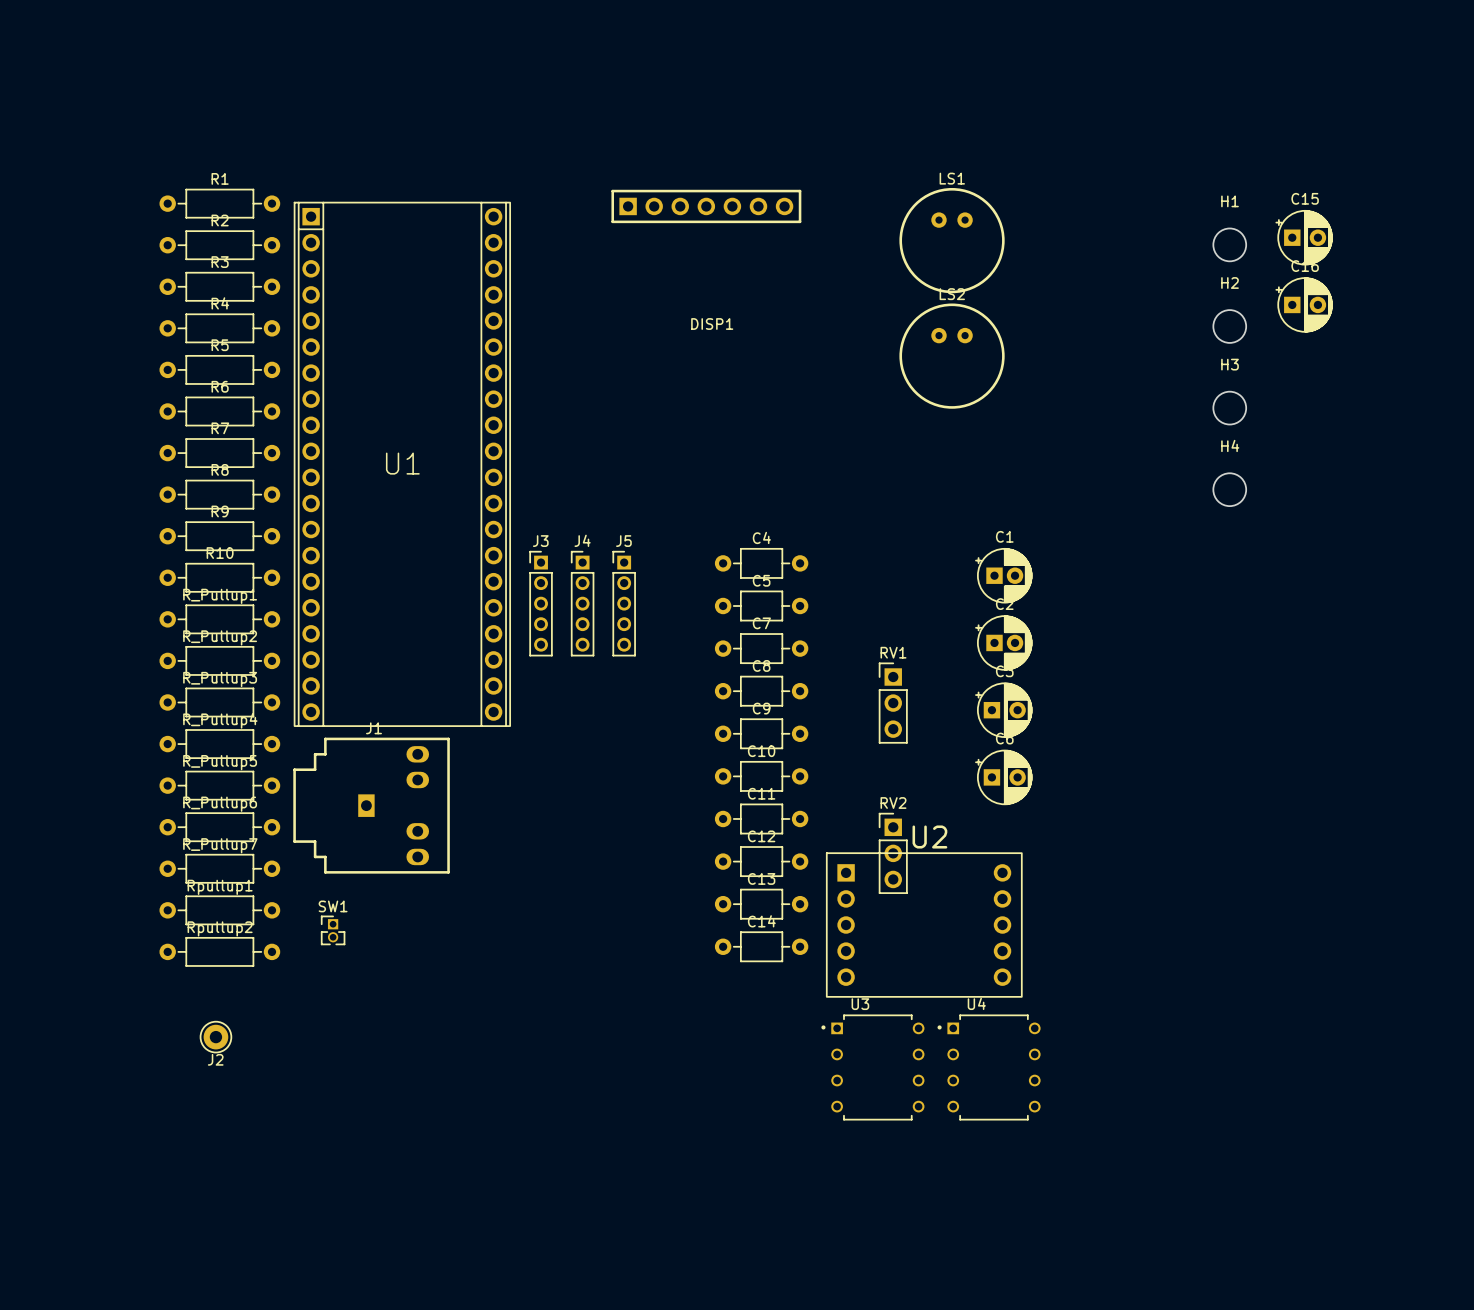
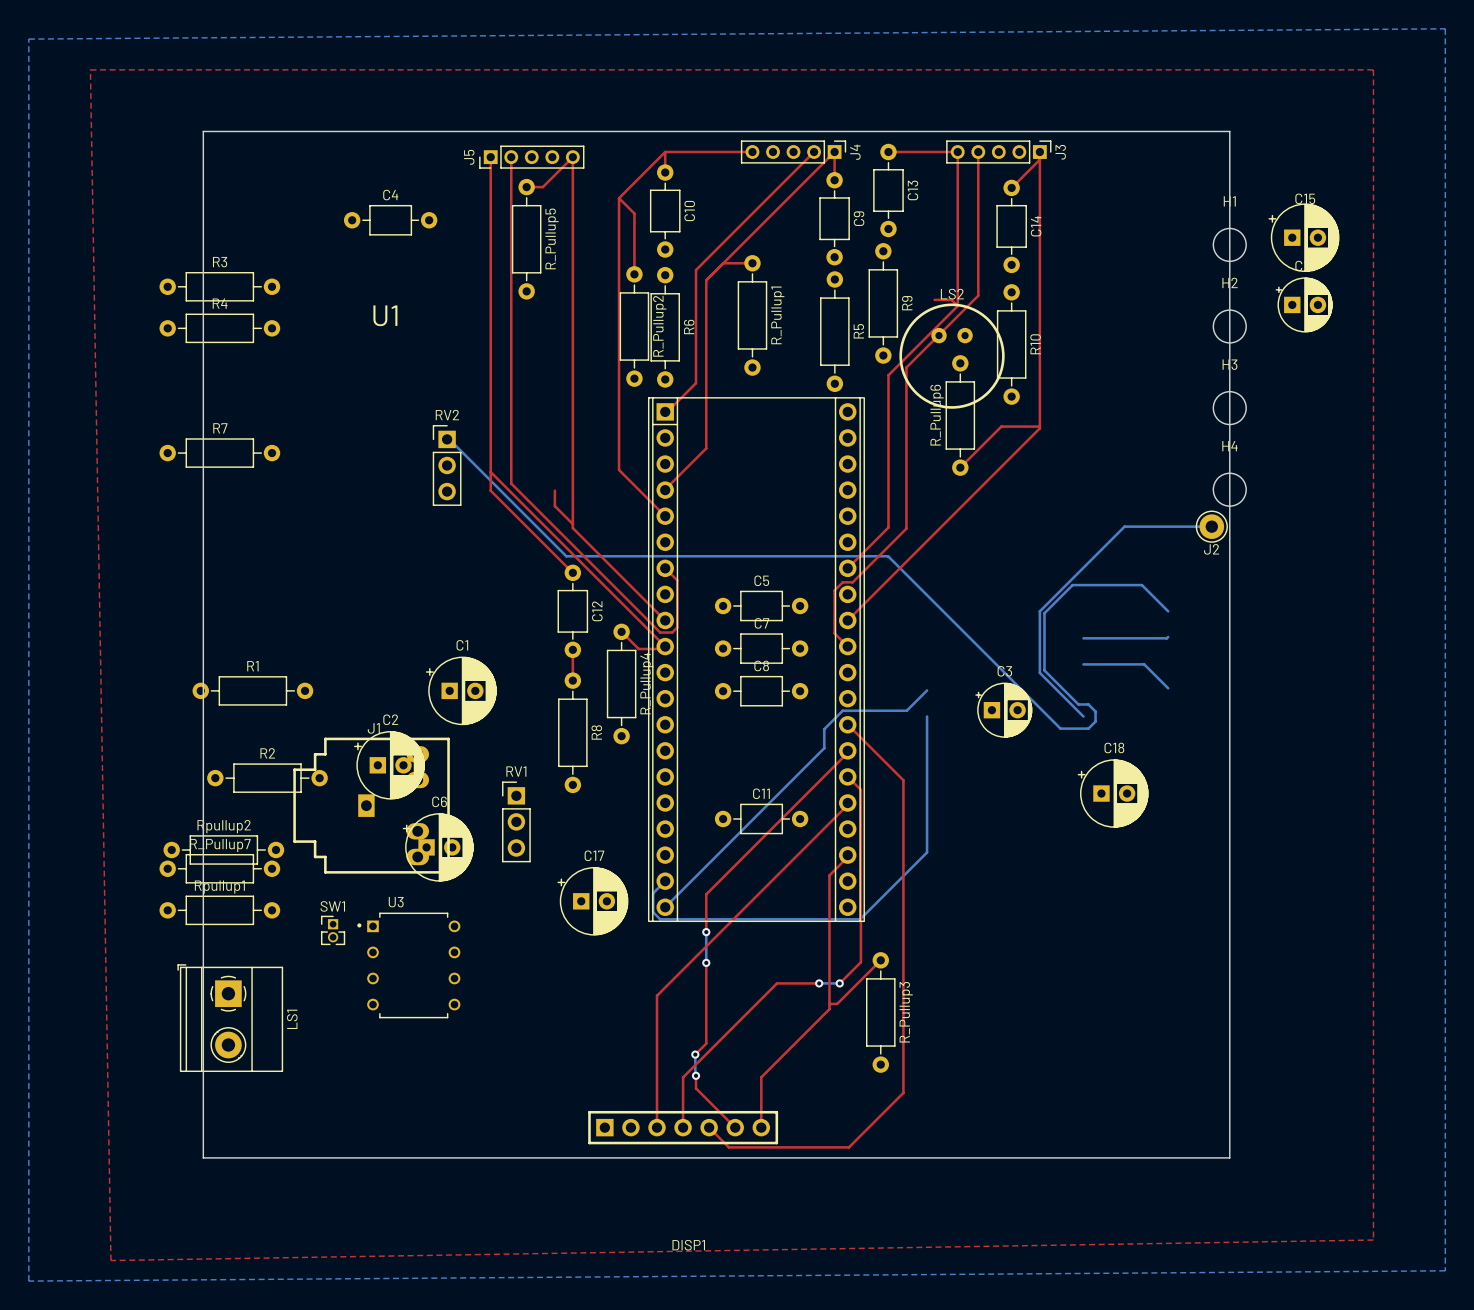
bottom zone outline: none -> (1445, 28) (28, 39) (28, 1281) (1445, 1270) (1445, 28)
top zone outline: none -> (90, 69) (1373, 69) (1373, 1240) (110, 1260) (90, 69)
board edge: none -> (203, 131) (1229, 131) (1229, 1157) (203, 1157) (203, 131)
top track: none -> (665, 152) (752, 152)
top track: none -> (665, 152) (665, 172)
top track: none -> (665, 152) (619, 198)
top track: none -> (814, 152) (696, 270) (696, 383) (666, 412)
top track: none -> (888, 152) (957, 152) (957, 305)
top track: none -> (978, 152) (978, 295) (906, 367) (906, 528) (852, 582) (842, 582) (834, 590) (834, 633) (847, 646)
top track: none -> (1039, 152) (1039, 428) (847, 620)
top track: none -> (490, 157) (490, 490) (572, 572)
top track: none -> (511, 157) (511, 483) (660, 632) (672, 632) (677, 627) (677, 580) (665, 568)
top track: none -> (1039, 159) (1011, 187)
LS1 name position: LS1 (952, 178) -> LS1 (292, 1019)
top track: none -> (834, 180) (834, 152) (706, 280) (706, 448) (668, 486) (665, 486)
top track: none -> (526, 187) (542, 187) (572, 157) (572, 528) (665, 620)
LS1 footprint: [899, 187, 1005, 294] -> [177, 964, 284, 1072]
top track: none -> (619, 198) (634, 213) (634, 274)
top track: none -> (619, 198) (619, 469) (665, 516)
R1 position: (219, 203) -> (252, 690)
DISP1 position: (706, 206) -> (683, 1127)
C15 footprint: [1275, 210, 1333, 266] -> [1268, 203, 1340, 272]
R2 position: (219, 245) -> (267, 778)
top track: none -> (723, 263) (752, 263)
top track: none -> (934, 299) (951, 299) (957, 305)
top track: none -> (957, 305) (888, 375) (888, 527) (847, 568)
R5 rotation: 0° (219, 369) -> 90° clockwise (834, 331)
R5 position: (219, 369) -> (834, 331)
R6 rotation: 0° (219, 411) -> 90° clockwise (665, 327)
R6 position: (219, 411) -> (665, 327)
top track: none -> (1039, 426) (1001, 426) (960, 467)
bottom track: none -> (447, 439) (449, 439) (566, 556) (888, 556) (1060, 728) (1088, 728) (1095, 721) (1095, 711) (1088, 704) (1078, 704) (1044, 670) (1044, 613) (1072, 585) (1141, 585) (1168, 611)
U1 name position: U1 (402, 463) -> U1 (385, 315)
U1 position: (402, 464) -> (756, 659)
top track: none -> (490, 472) (665, 646) (662, 649) (638, 649) (621, 631)
top track: none -> (554, 490) (554, 506) (572, 524)
R8 rotation: 0° (219, 494) -> 90° clockwise (572, 732)
R8 position: (219, 494) -> (572, 732)
bottom track: none -> (1211, 526) (1124, 526) (1039, 611) (1039, 672) (1083, 716)
R9 rotation: 0° (219, 536) -> 90° clockwise (883, 303)
R9 position: (219, 536) -> (883, 303)
C1 footprint: [975, 548, 1033, 604] -> [425, 656, 497, 726]
C4 position: (761, 563) -> (390, 220)
R10 rotation: 0° (219, 577) -> 90° clockwise (1011, 344)
R10 position: (219, 577) -> (1011, 344)
J3 rotation: 0° (541, 603) -> 90° clockwise (998, 152)
J3 position: (541, 603) -> (998, 152)
J4 rotation: 0° (582, 603) -> 90° clockwise (793, 152)
J4 position: (582, 603) -> (793, 152)
J5 rotation: 0° (624, 603) -> 90° counterclockwise (531, 157)
J5 position: (624, 603) -> (531, 157)
C2 footprint: [975, 615, 1033, 671] -> [354, 731, 425, 800]
R_Pullup1 rotation: 0° (219, 619) -> 90° clockwise (752, 315)
R_Pullup1 position: (219, 619) -> (752, 315)
bottom track: none -> (1168, 637) (1083, 638)
top track: none -> (572, 649) (572, 680)
R_Pullup2 rotation: 0° (219, 660) -> 90° clockwise (634, 326)
R_Pullup2 position: (219, 660) -> (634, 326)
bottom track: none -> (1083, 664) (1144, 664) (1168, 688)
bottom track: none -> (927, 690) (906, 710) (842, 710) (824, 729) (824, 748) (665, 907)
R_Pullup3 rotation: 0° (219, 702) -> 90° clockwise (880, 1012)
R_Pullup3 position: (219, 702) -> (880, 1012)
RV1 position: (893, 703) -> (516, 821)
bottom track: none -> (927, 716) (927, 852) (860, 919) (660, 919) (653, 912) (653, 893) (665, 881)
top track: none -> (848, 725) (903, 780) (903, 1092) (848, 1147) (728, 1147) (709, 1127)
C9 rotation: 0° (761, 733) -> 90° clockwise (834, 218)
C9 position: (761, 733) -> (834, 218)
R_Pullup4 rotation: 0° (219, 744) -> 90° clockwise (621, 684)
R_Pullup4 position: (219, 744) -> (621, 684)
C6 footprint: [975, 749, 1033, 805] -> [402, 813, 474, 882]
top track: none -> (848, 751) (706, 894) (706, 932)
C10 rotation: 0° (761, 776) -> 90° clockwise (665, 211)
C10 position: (761, 776) -> (665, 211)
top track: none -> (848, 777) (860, 789) (860, 962) (839, 983)
R_Pullup5 rotation: 0° (219, 785) -> 90° clockwise (526, 239)
R_Pullup5 position: (219, 785) -> (526, 239)
C18: none -> (1113, 793)
top track: none -> (848, 803) (657, 995) (657, 1127)
R_Pullup6 name position: R_Pullup6 (220, 804) -> R_Pullup6 (936, 415)
R_Pullup6 rotation: 0° (219, 827) -> 90° clockwise (960, 415)
R_Pullup6 position: (219, 827) -> (960, 415)
RV2 position: (893, 853) -> (447, 465)
top track: none -> (848, 856) (829, 875) (829, 1009) (761, 1077) (761, 1127)
C12 rotation: 0° (761, 861) -> 90° clockwise (572, 611)
C12 position: (761, 861) -> (572, 611)
C17: none -> (592, 901)
C13 rotation: 0° (761, 904) -> 90° clockwise (888, 190)
C13 position: (761, 904) -> (888, 190)
U2: (924, 925) -> none
bottom track: none -> (706, 932) (706, 962)
via: none -> (706, 932)
C14 rotation: 0° (761, 946) -> 90° clockwise (1011, 226)
C14 position: (761, 946) -> (1011, 226)
Rpullup2 position: (219, 951) -> (223, 849)
top track: none -> (880, 960) (837, 1003) (829, 1003)
top track: none -> (706, 962) (706, 1043) (695, 1054)
via: none -> (706, 962)
bottom track: none -> (819, 983) (839, 983)
top track: none -> (819, 983) (777, 983) (683, 1077) (683, 1127)
via: none -> (819, 983)
via: none -> (839, 983)
J2 position: (215, 1037) -> (1211, 526)
bottom track: none -> (695, 1054) (696, 1075)
via: none -> (695, 1054)
U3 position: (872, 1067) -> (408, 965)
U4: (989, 1067) -> none
top track: none -> (696, 1075) (696, 1088) (735, 1127)
via: none -> (696, 1075)

